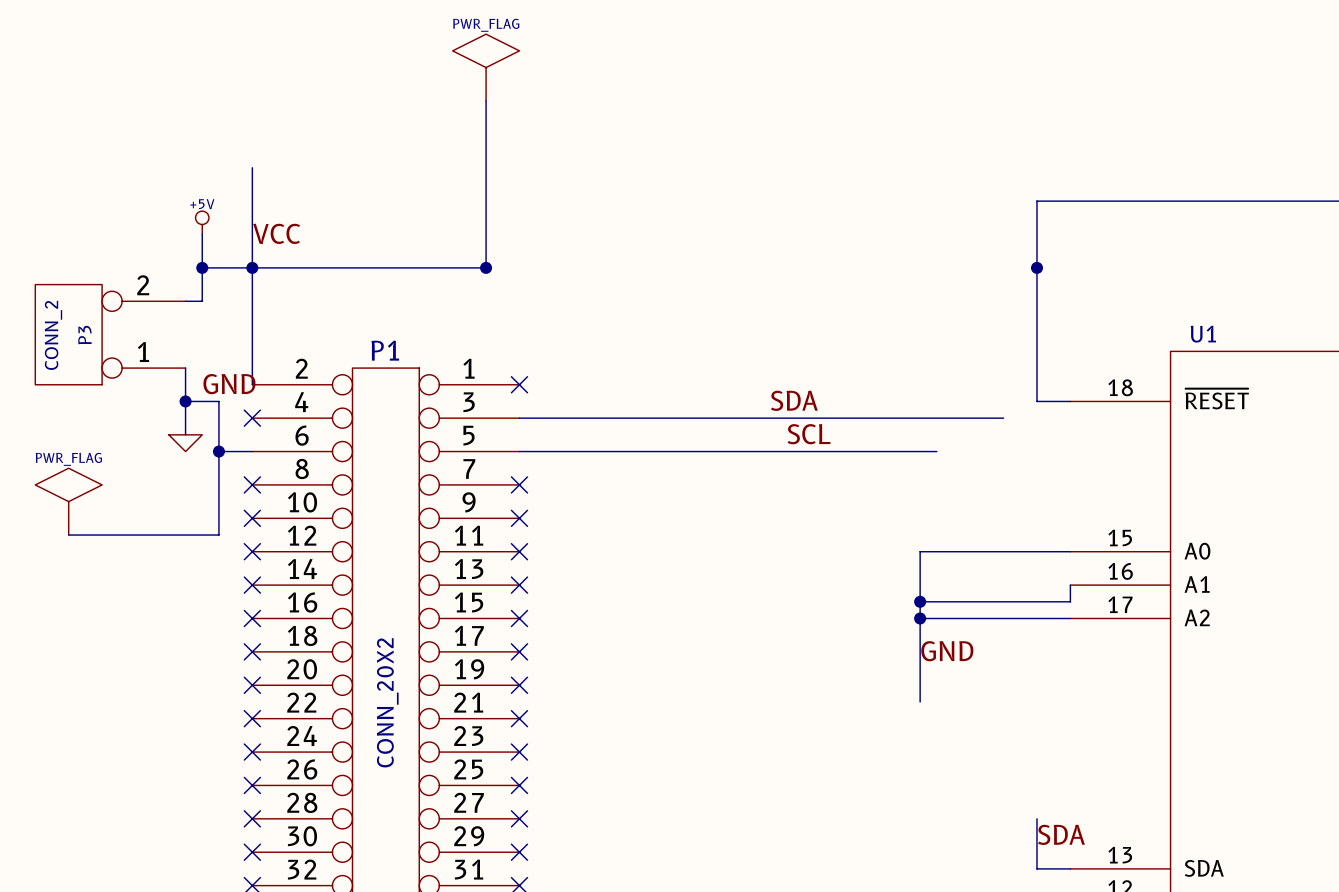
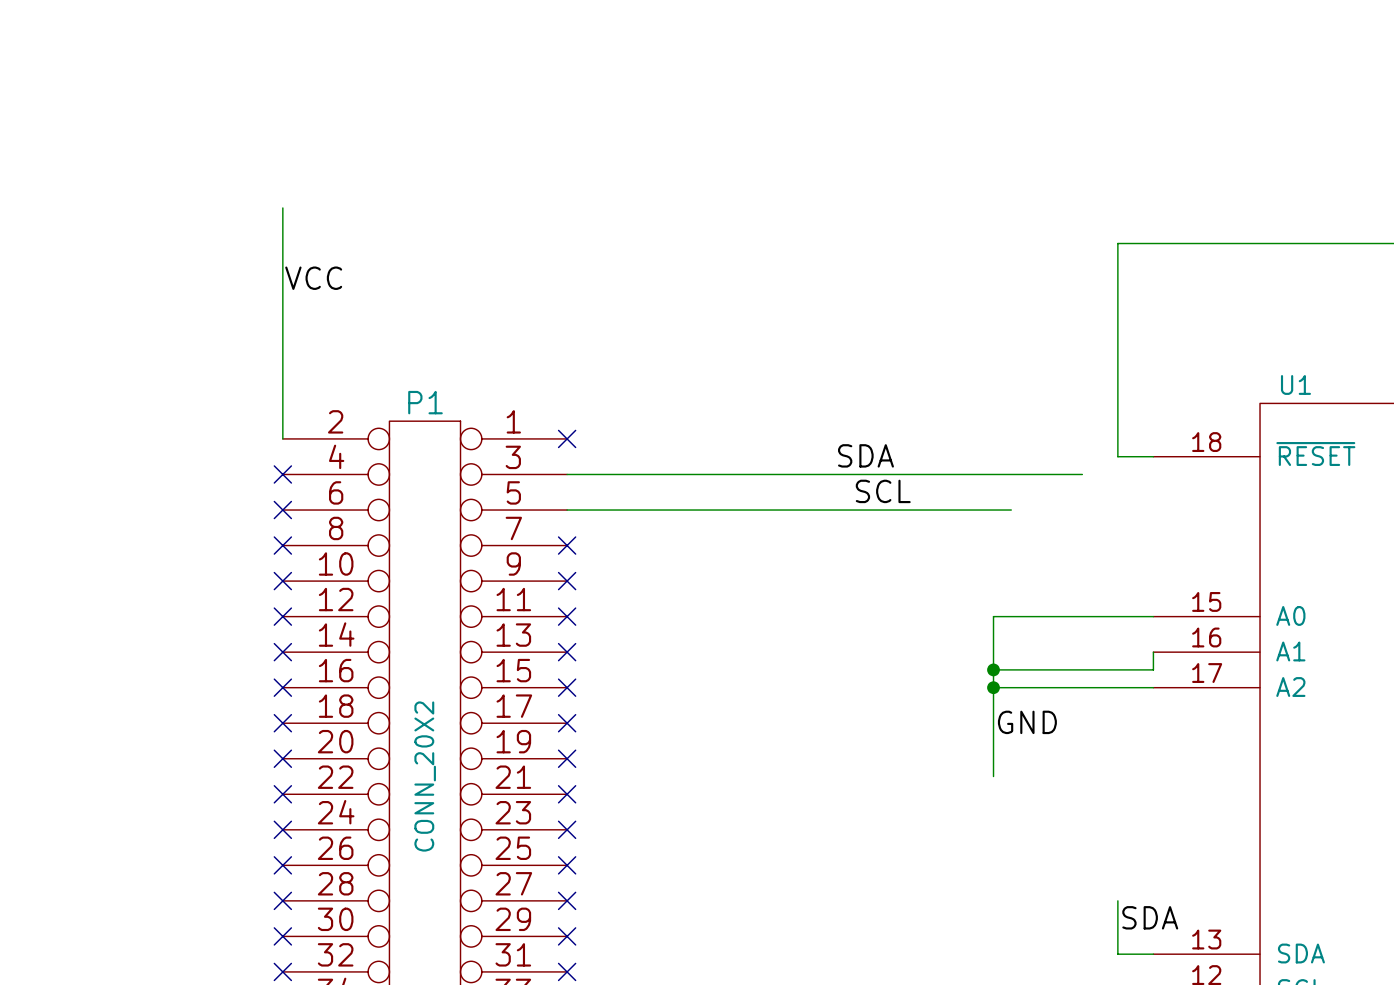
power symbol: PWR_FLAG (486, 67) -> none
wire: (486, 100) (486, 267) (202, 267) -> none
power symbol: +5V (202, 222) -> none
wire: (202, 234) (202, 301) (185, 301) -> none
junction: (202, 267) -> none
junction: (252, 267) -> none
junction: (486, 267) -> none
junction: (1036, 267) -> none
P3: CONN_2 (110, 334) -> none
wire: (185, 368) (185, 434) -> none
label: GND (229, 384) -> none
wire: (185, 401) (218, 401) (218, 535) (68, 535) -> none
junction: (185, 401) -> none
power symbol: (185, 443) -> none
wire: (218, 451) (252, 451) -> none
junction: (218, 451) -> none
no-connect mark: none -> (282, 510)
power symbol: PWR_FLAG (68, 501) -> none

